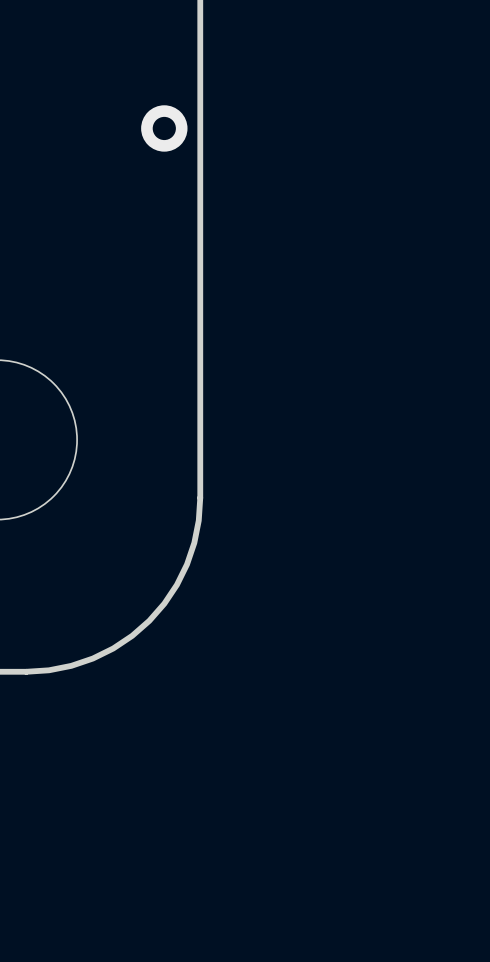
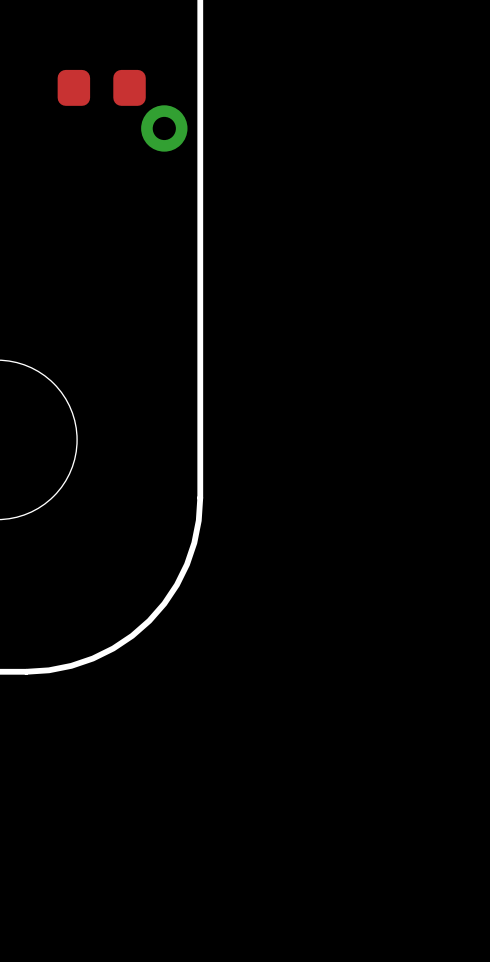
part: none -> (101, 87)

